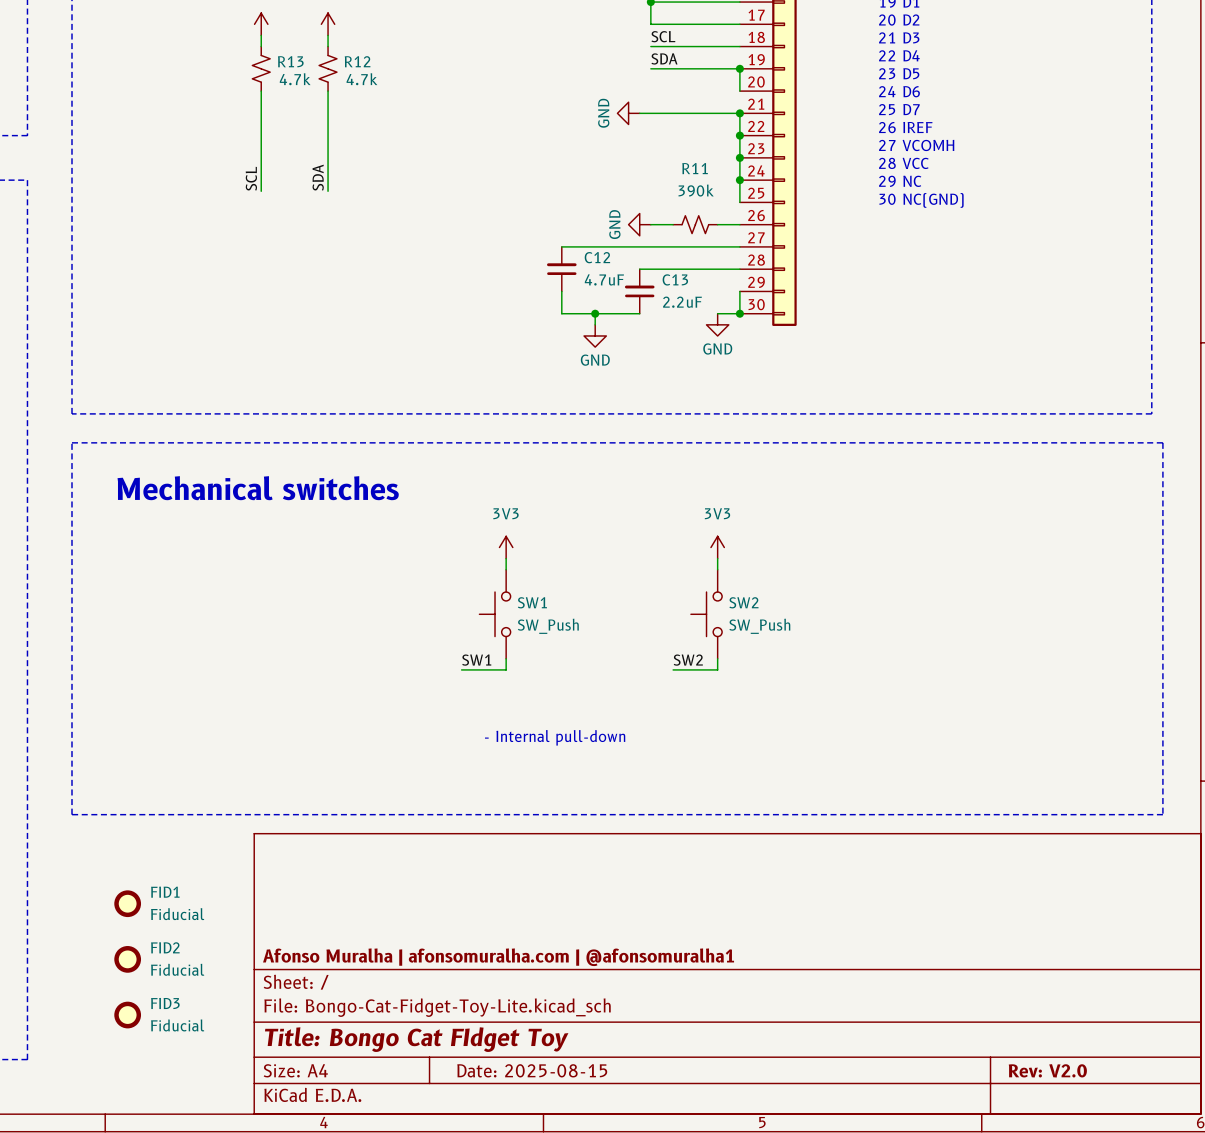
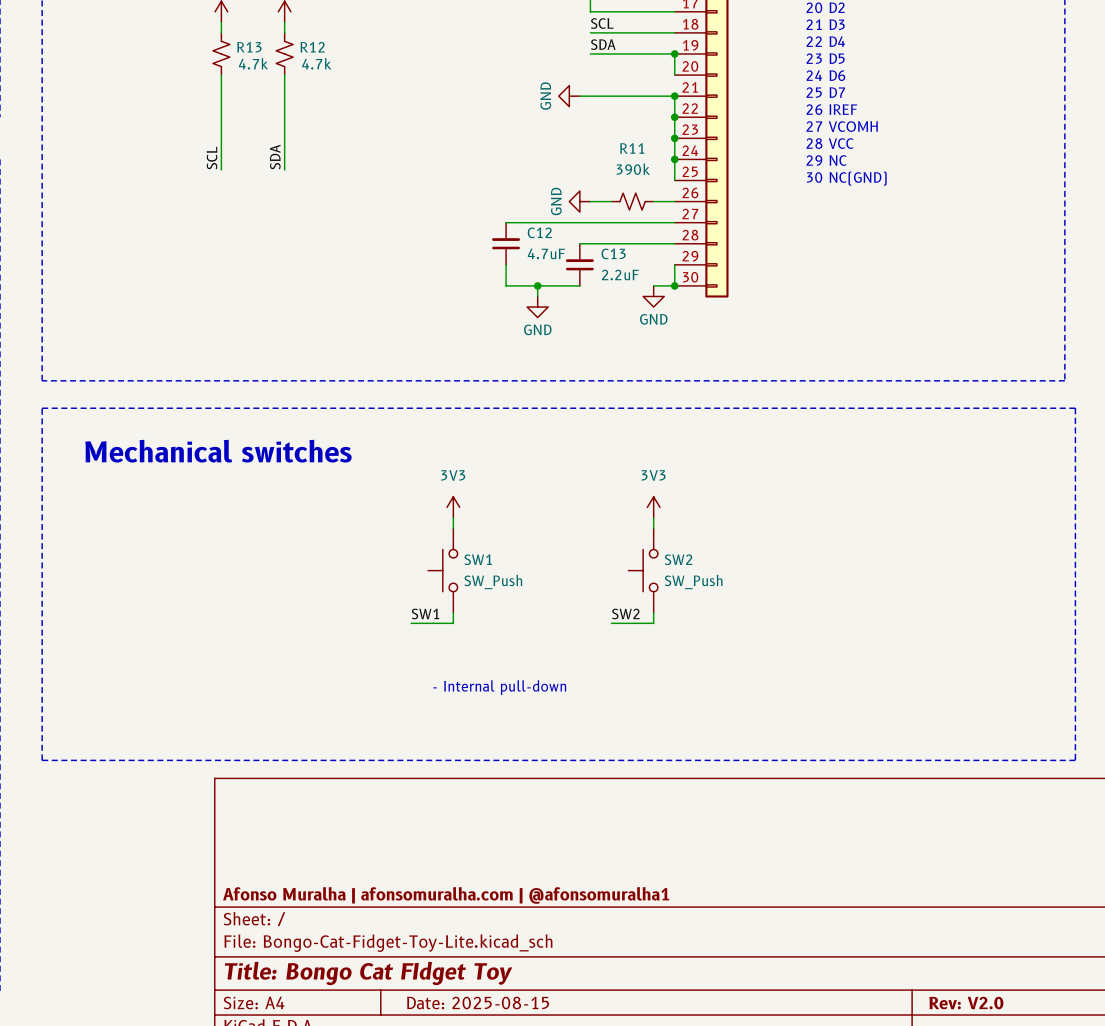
FID1: Fiducial (127, 903) -> none
FID2: Fiducial (127, 959) -> none
FID3: Fiducial (127, 1015) -> none

